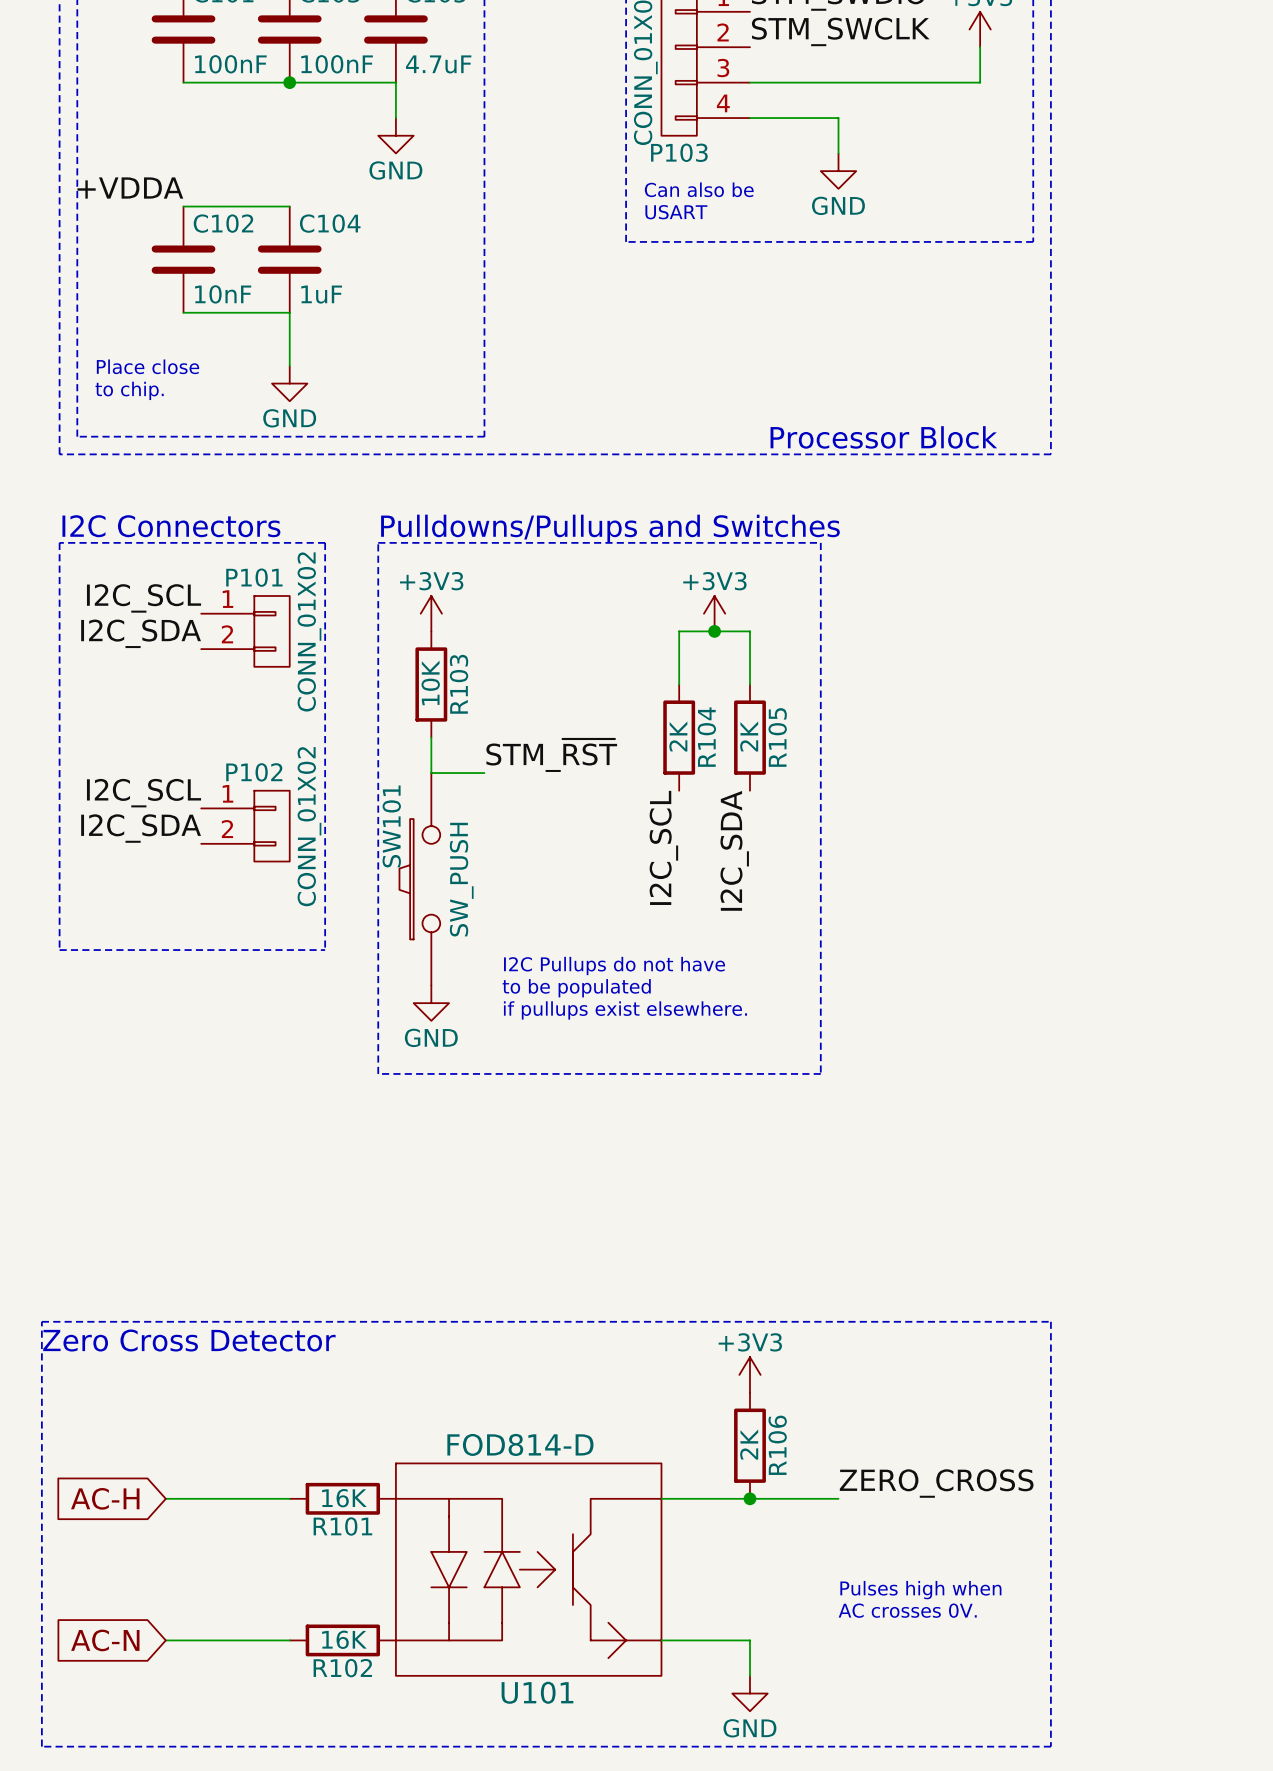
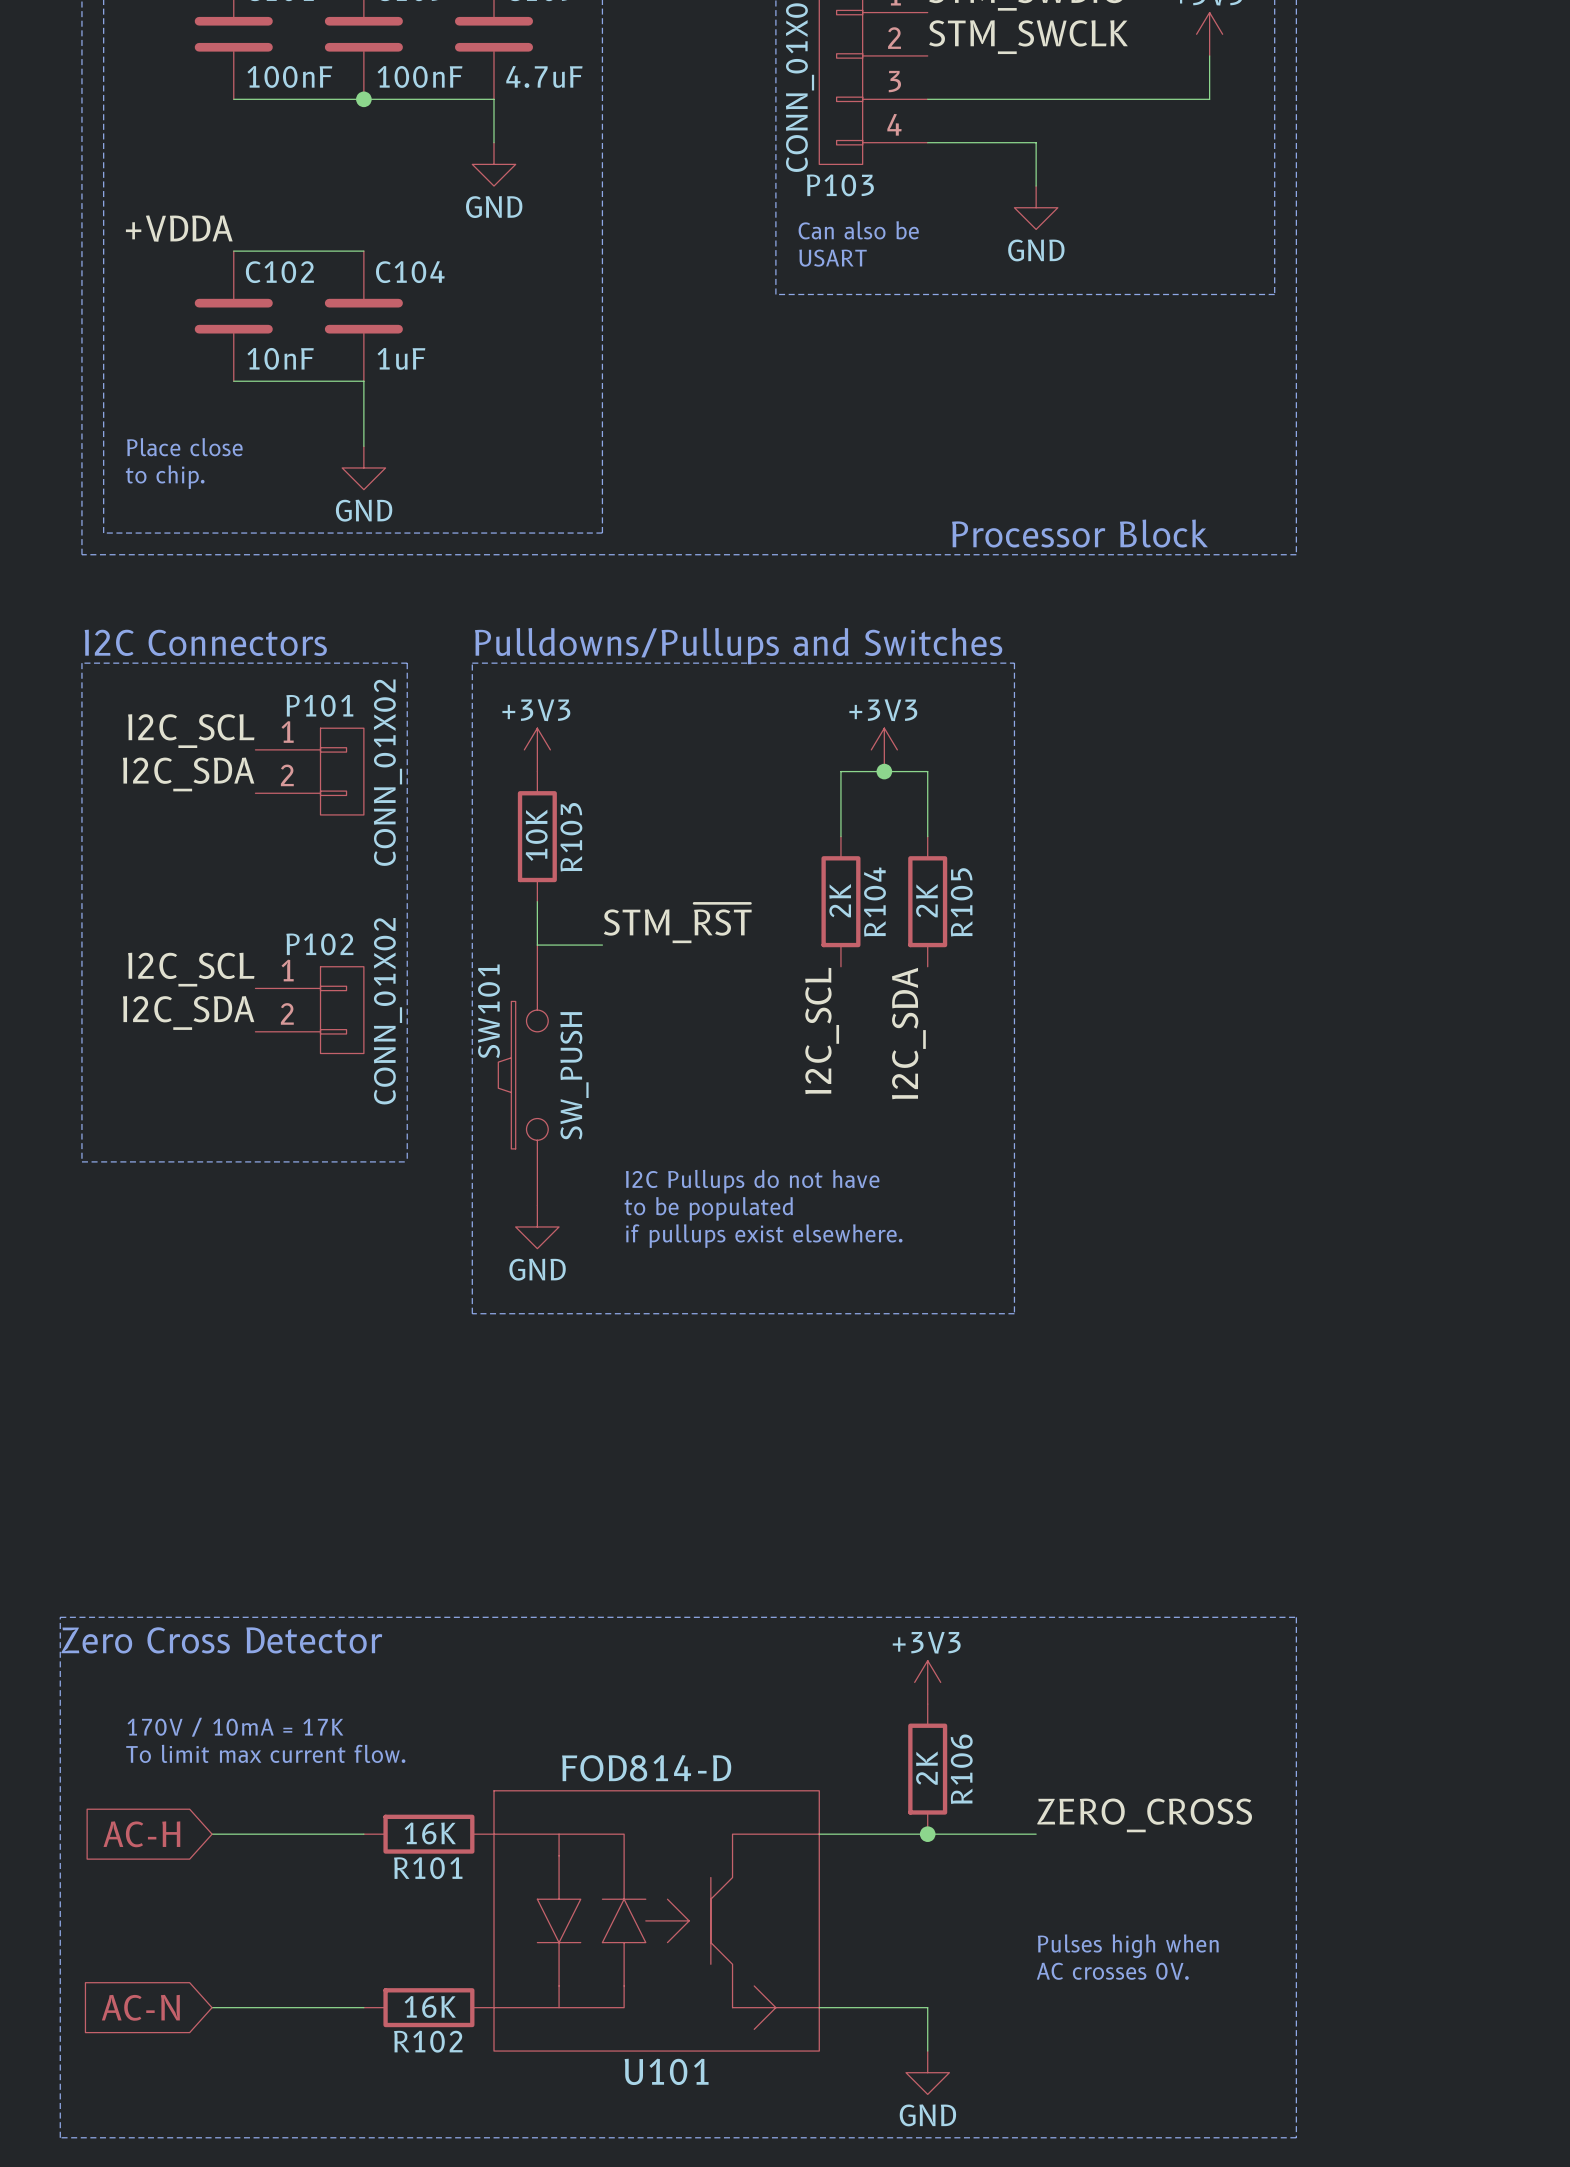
text: none -> 170V / 10mA = 17K (235, 1727)
text: none -> To limit max current flow. (265, 1753)

